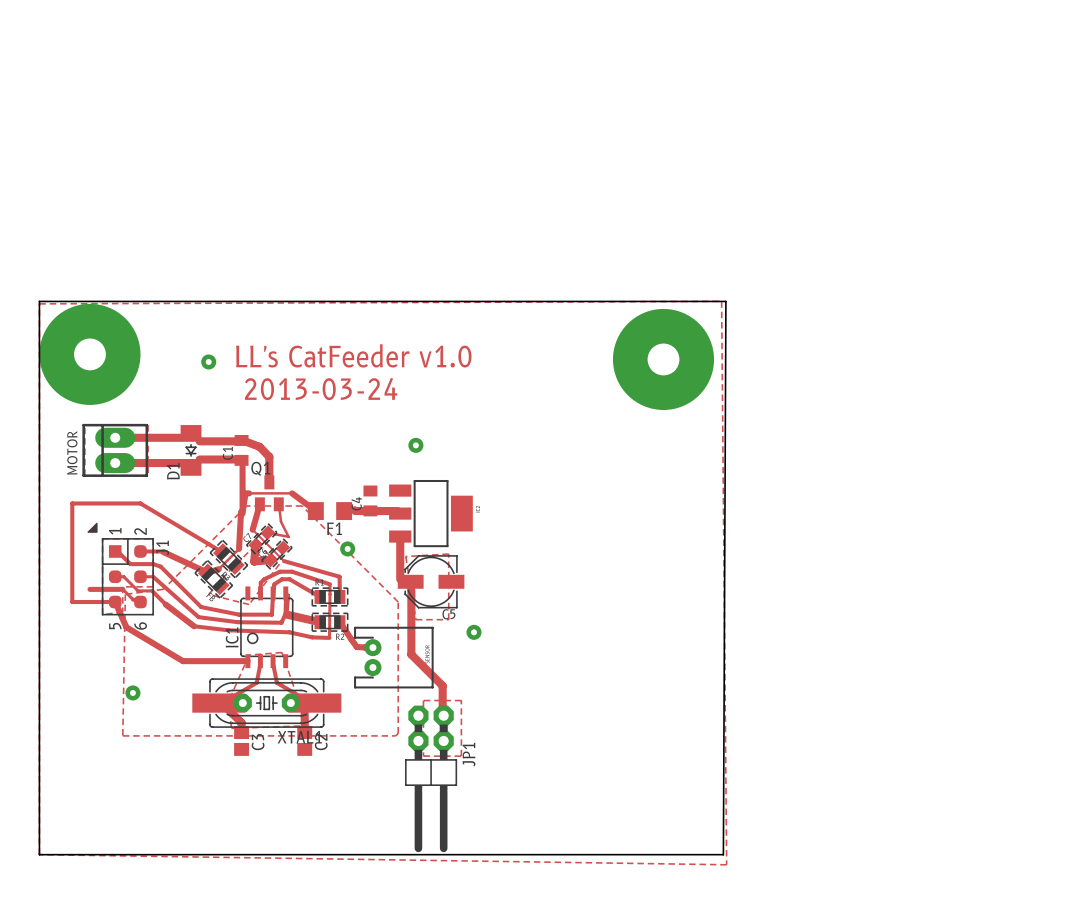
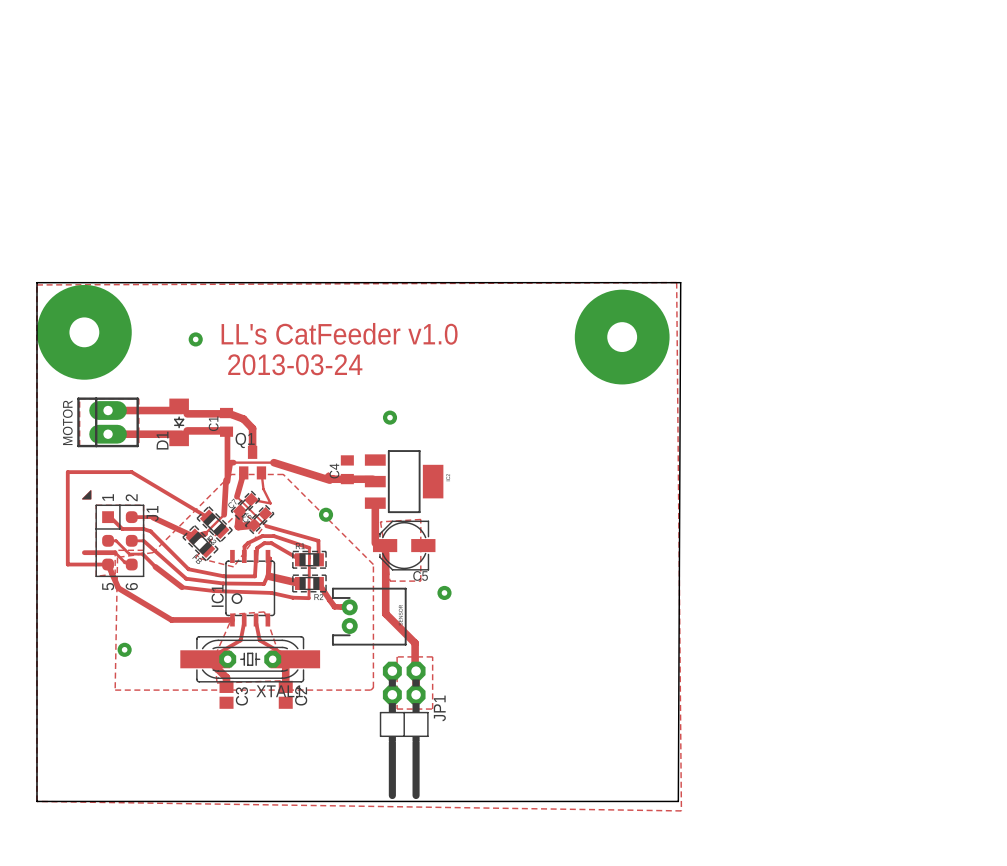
track: (292, 493) (315, 511) -> (273, 462) (329, 480) (347, 479)
F1: (329, 511) -> none

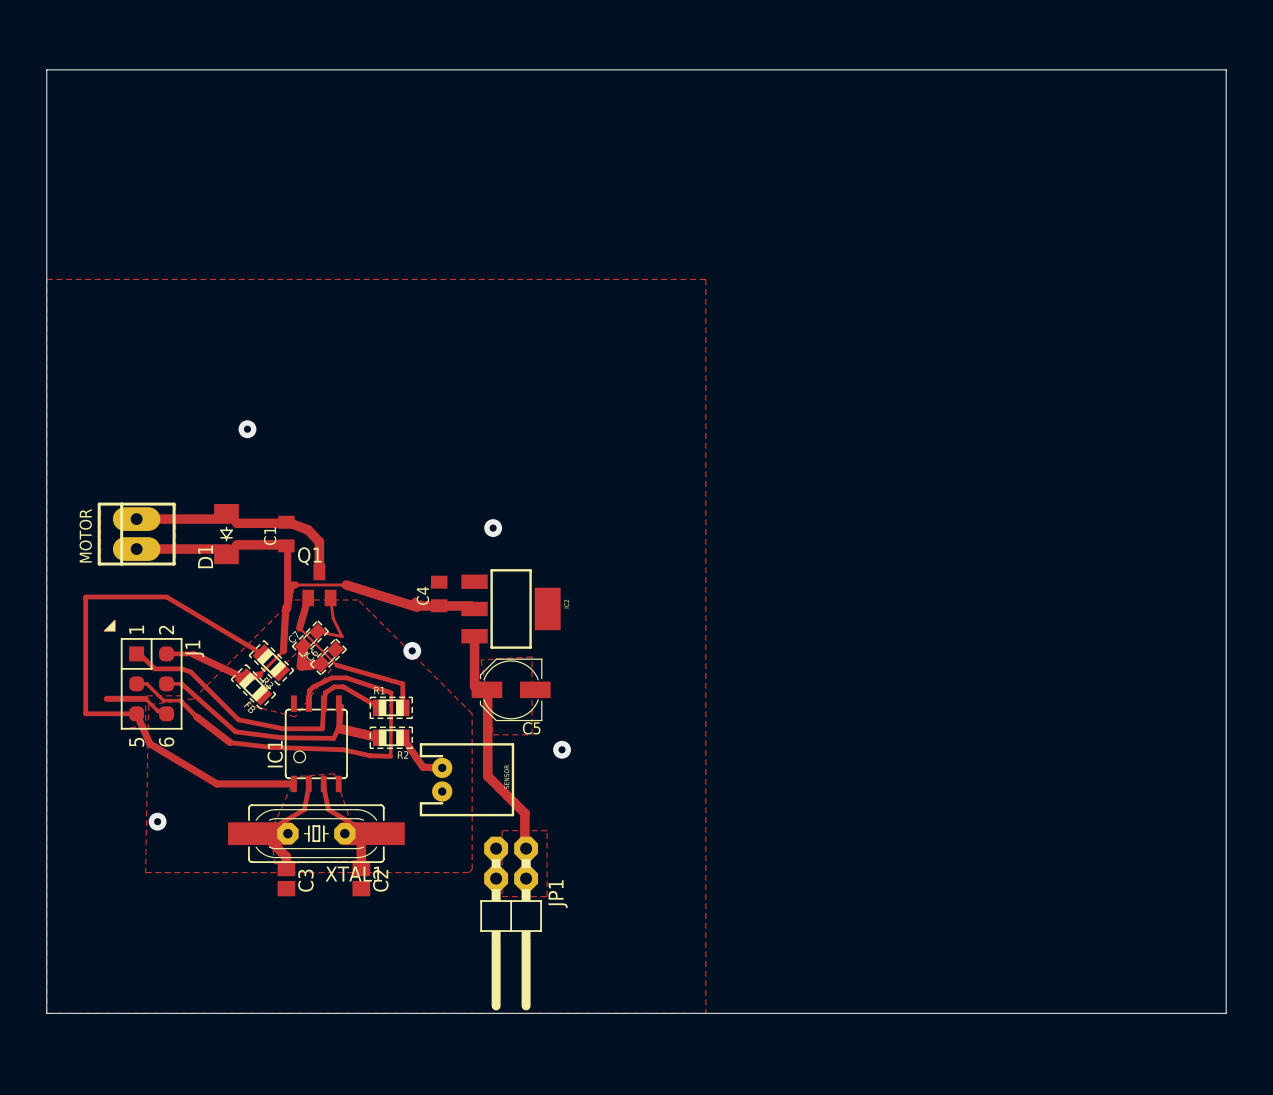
board edge: (36, 282) (680, 282) (678, 801) -> (46, 357) (46, 69) (1226, 69) (1226, 1013) (857, 1013)
zone outline: (36, 284) (676, 282) (681, 810) (36, 801) -> (46, 360) (46, 279) (705, 279) (705, 1013) (46, 1013)
via: (84, 332) -> none
text: LL's CatFeeder v1.0 (339, 333) -> none
via: (622, 337) -> none
text: 2013-03-24 (295, 364) -> none

